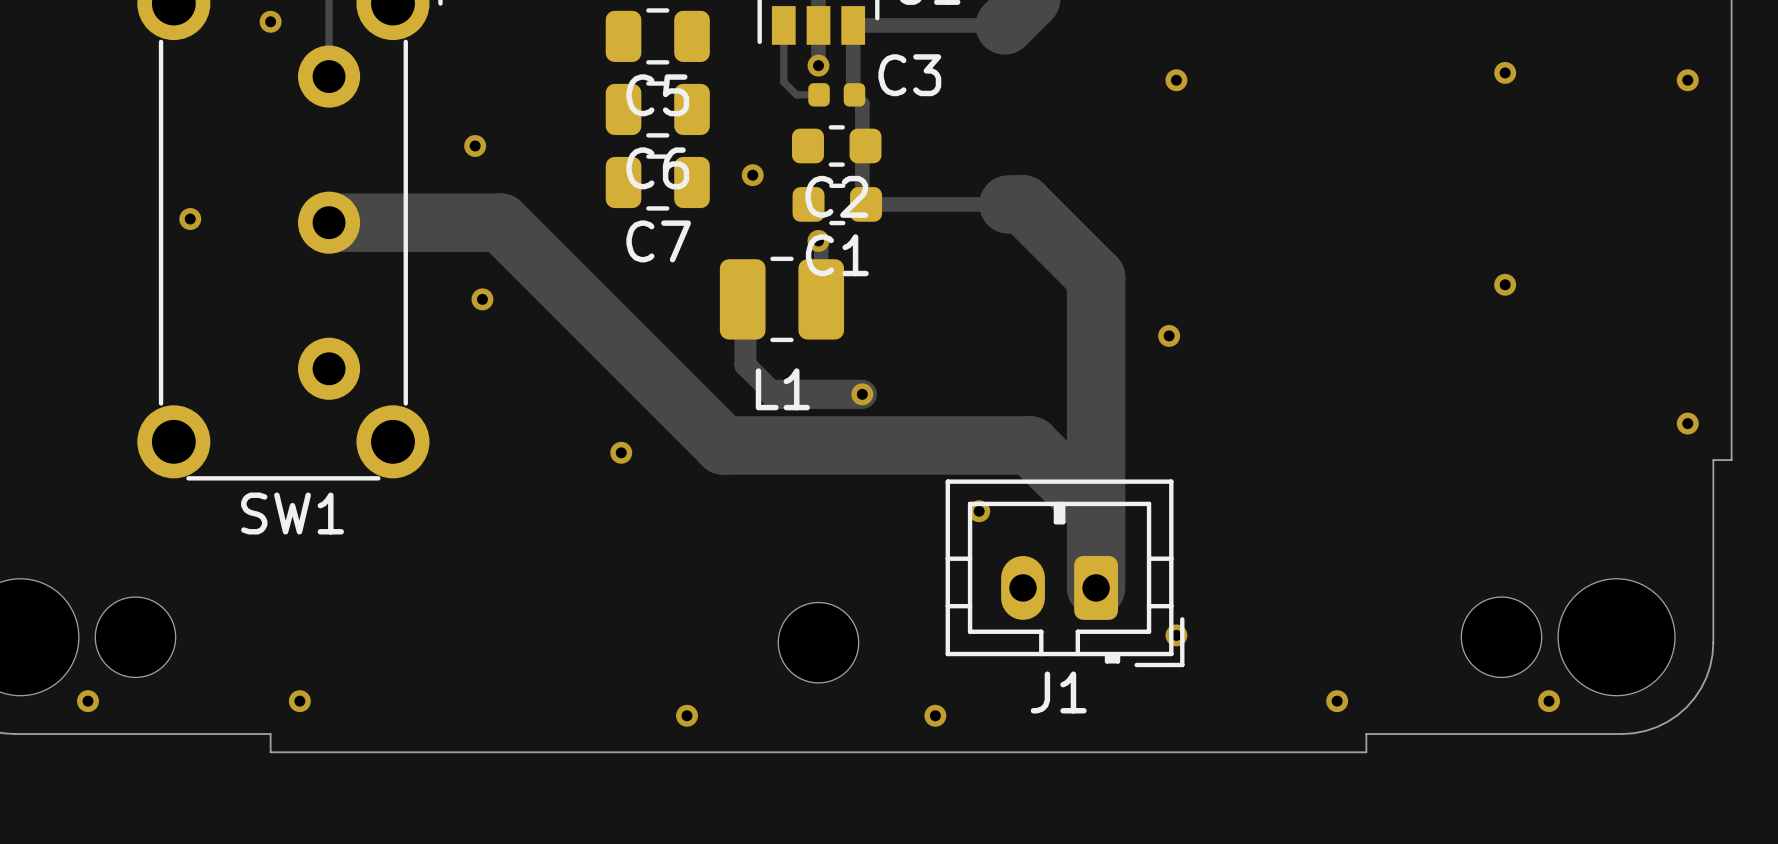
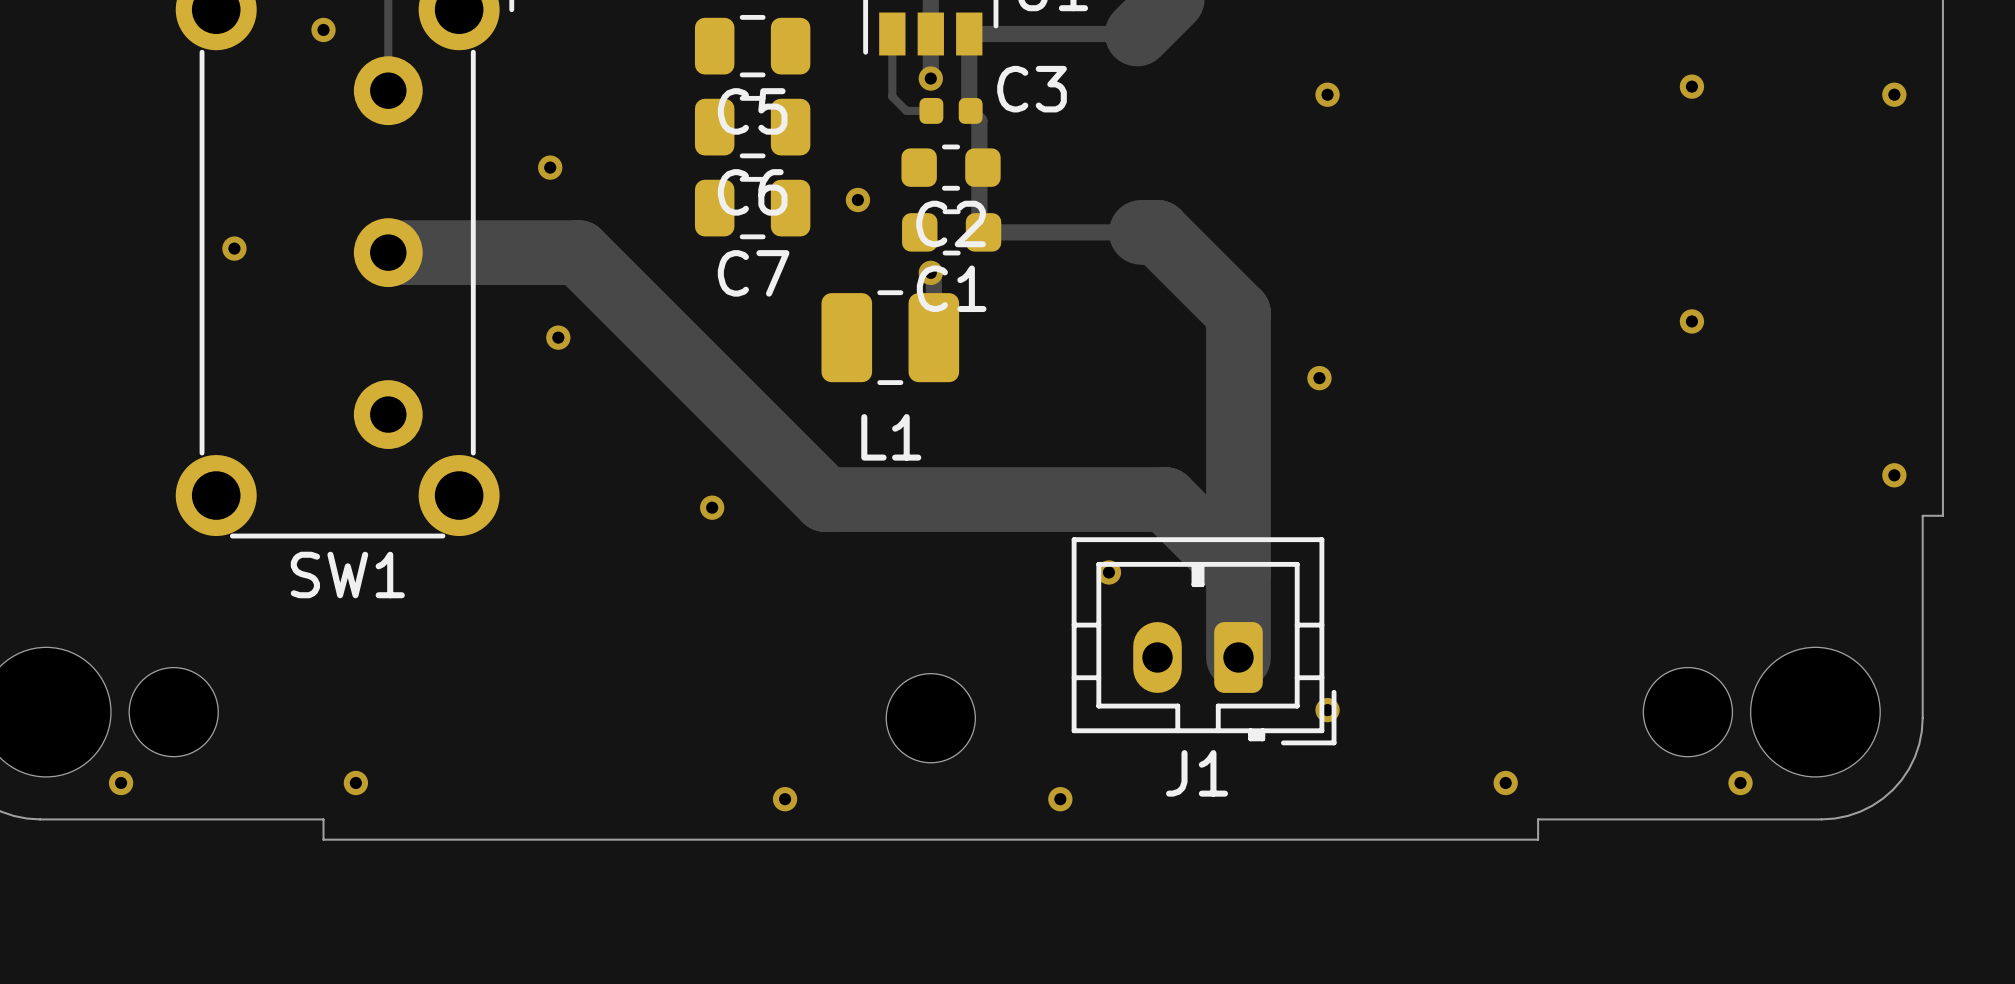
track: (745, 298) (745, 365) (774, 394) (862, 394) -> none
via: (862, 394) -> none

